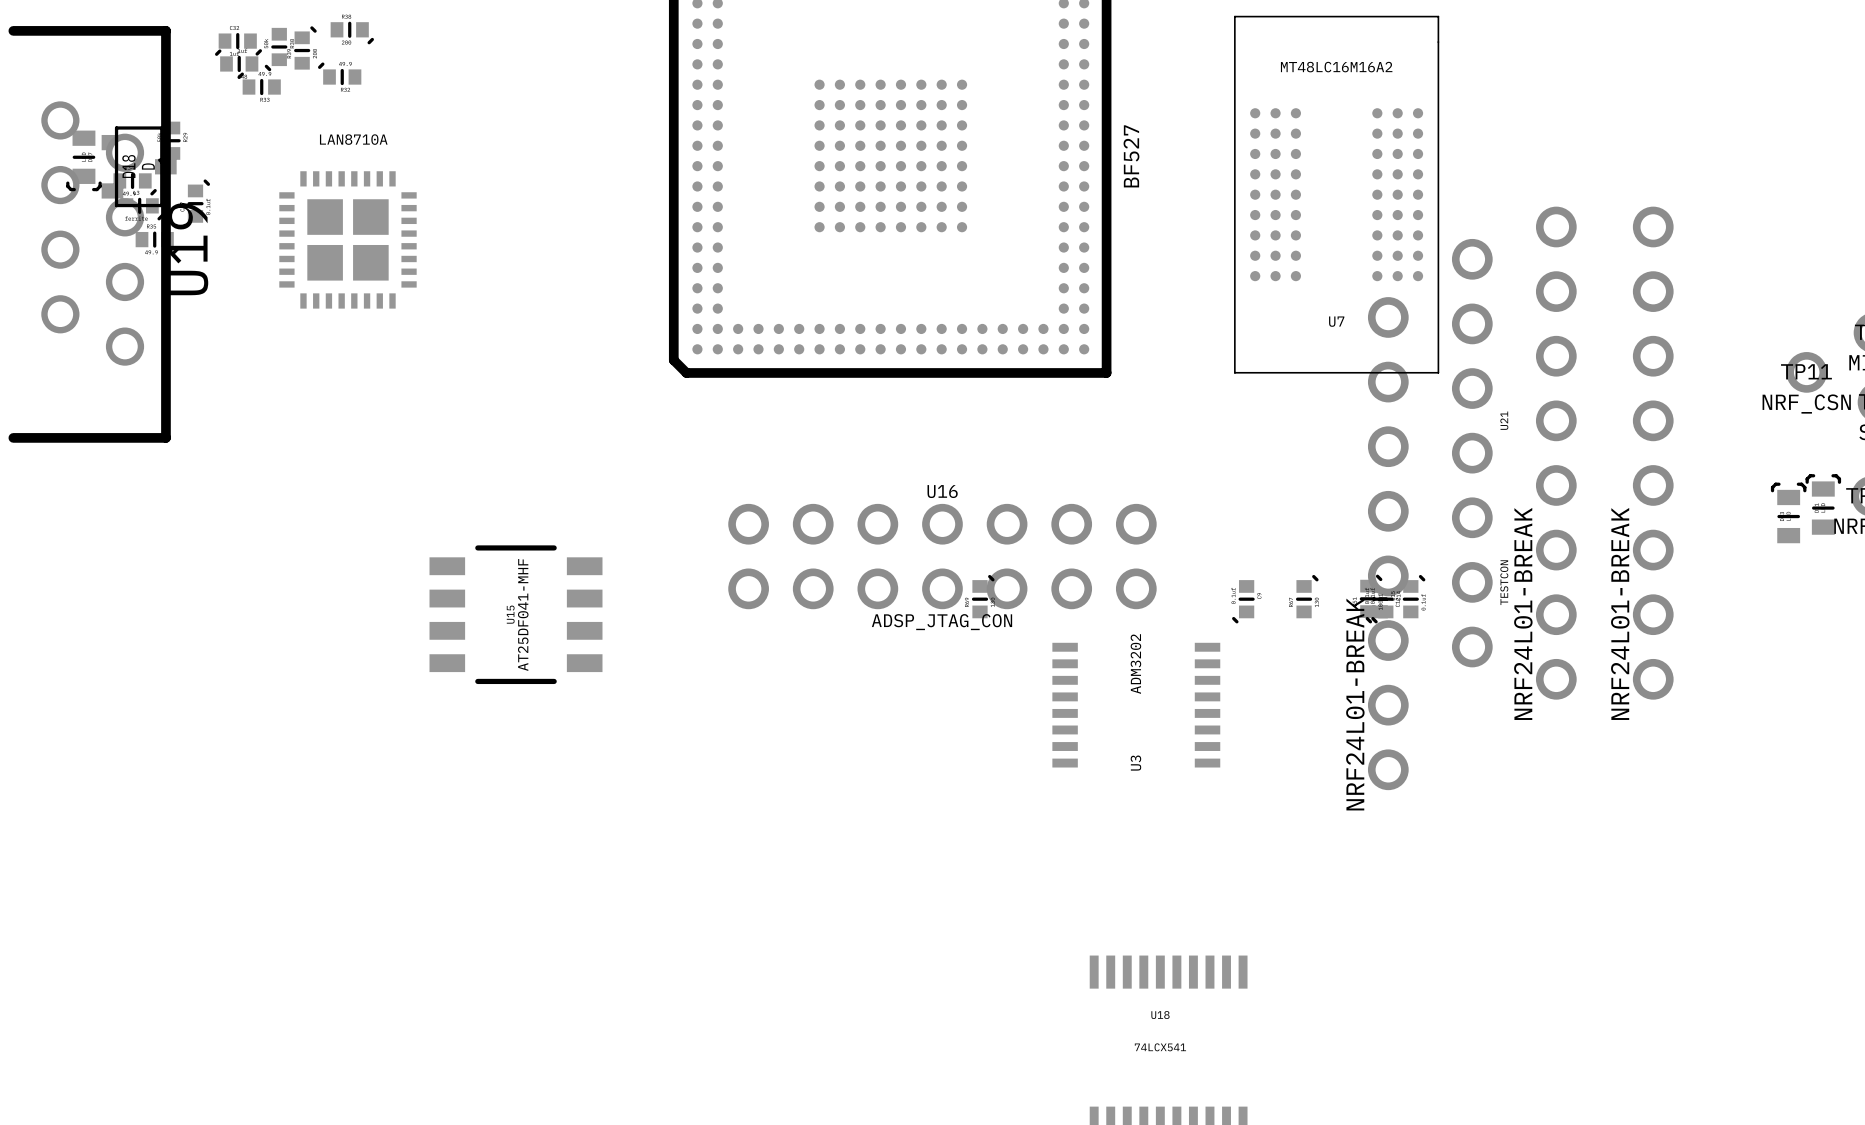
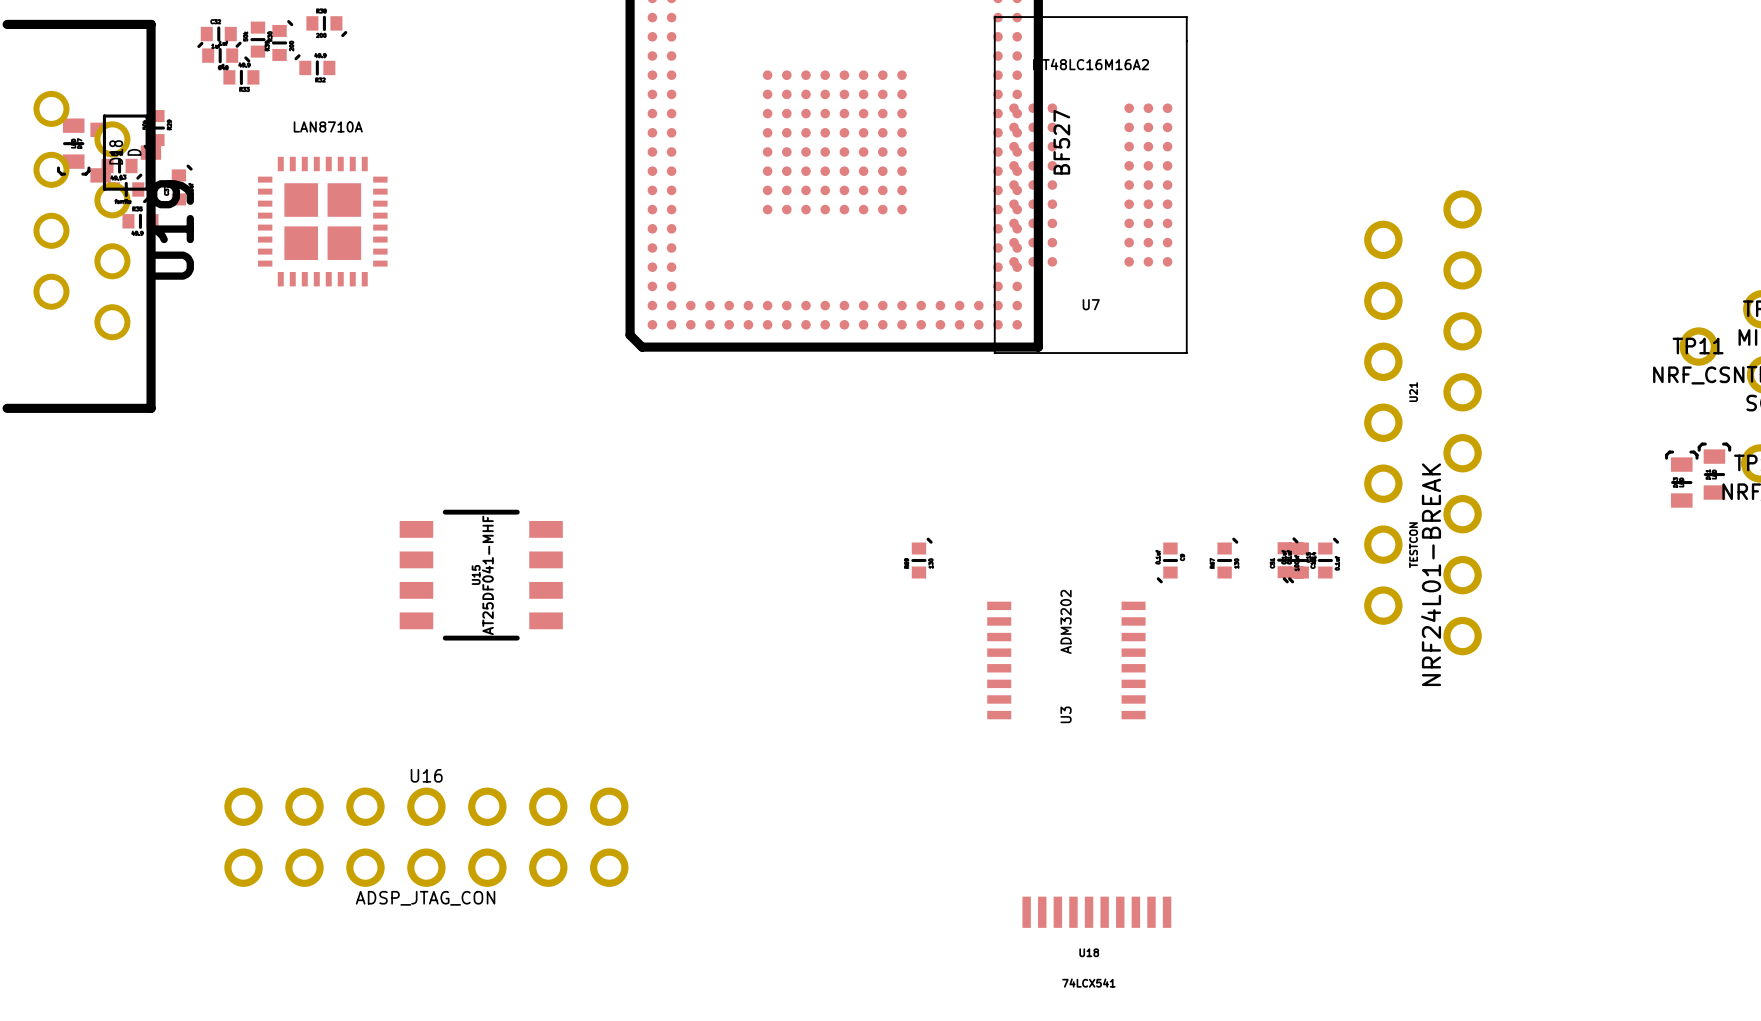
U7 position: (1336, 194) -> (1090, 185)
part: NRF24L01-BREAK (1653, 453) -> none
part: NRF24L01-BREAK (1388, 543) -> none
U16 position: (942, 556) -> (426, 837)

